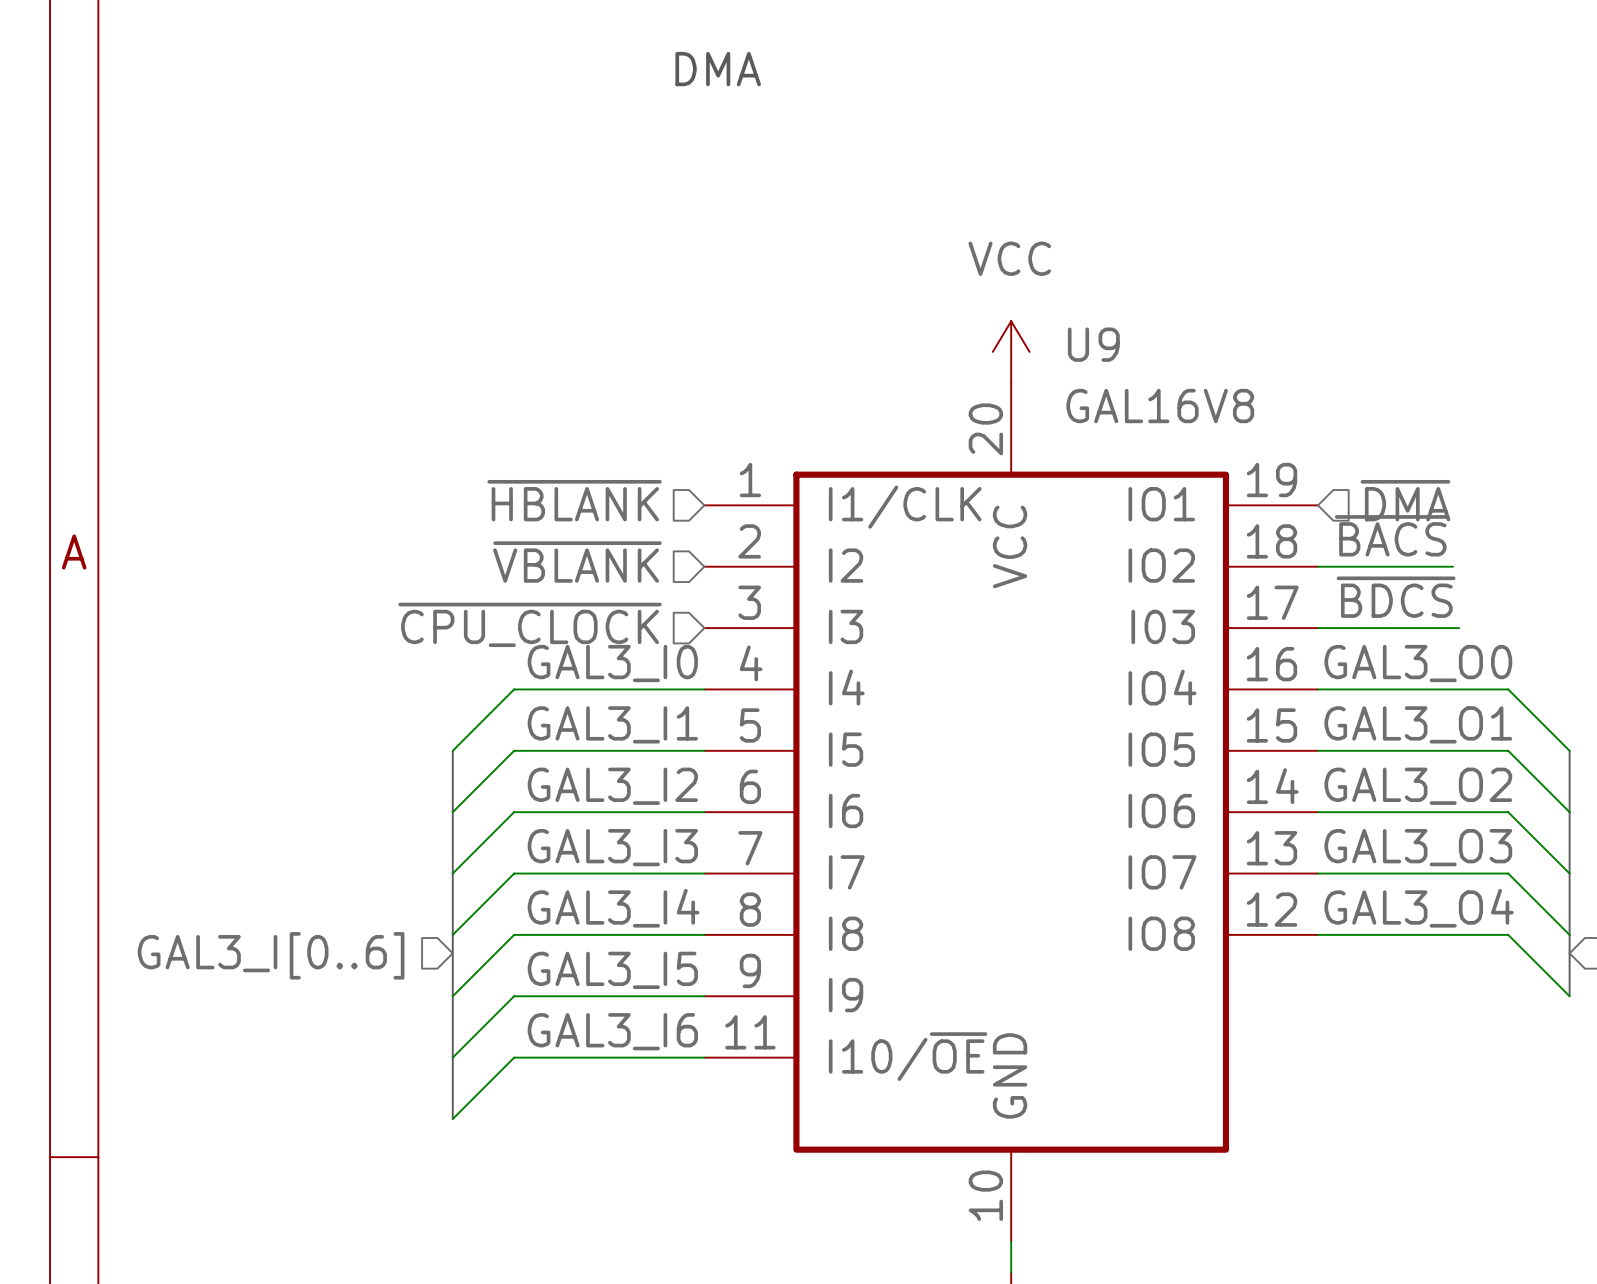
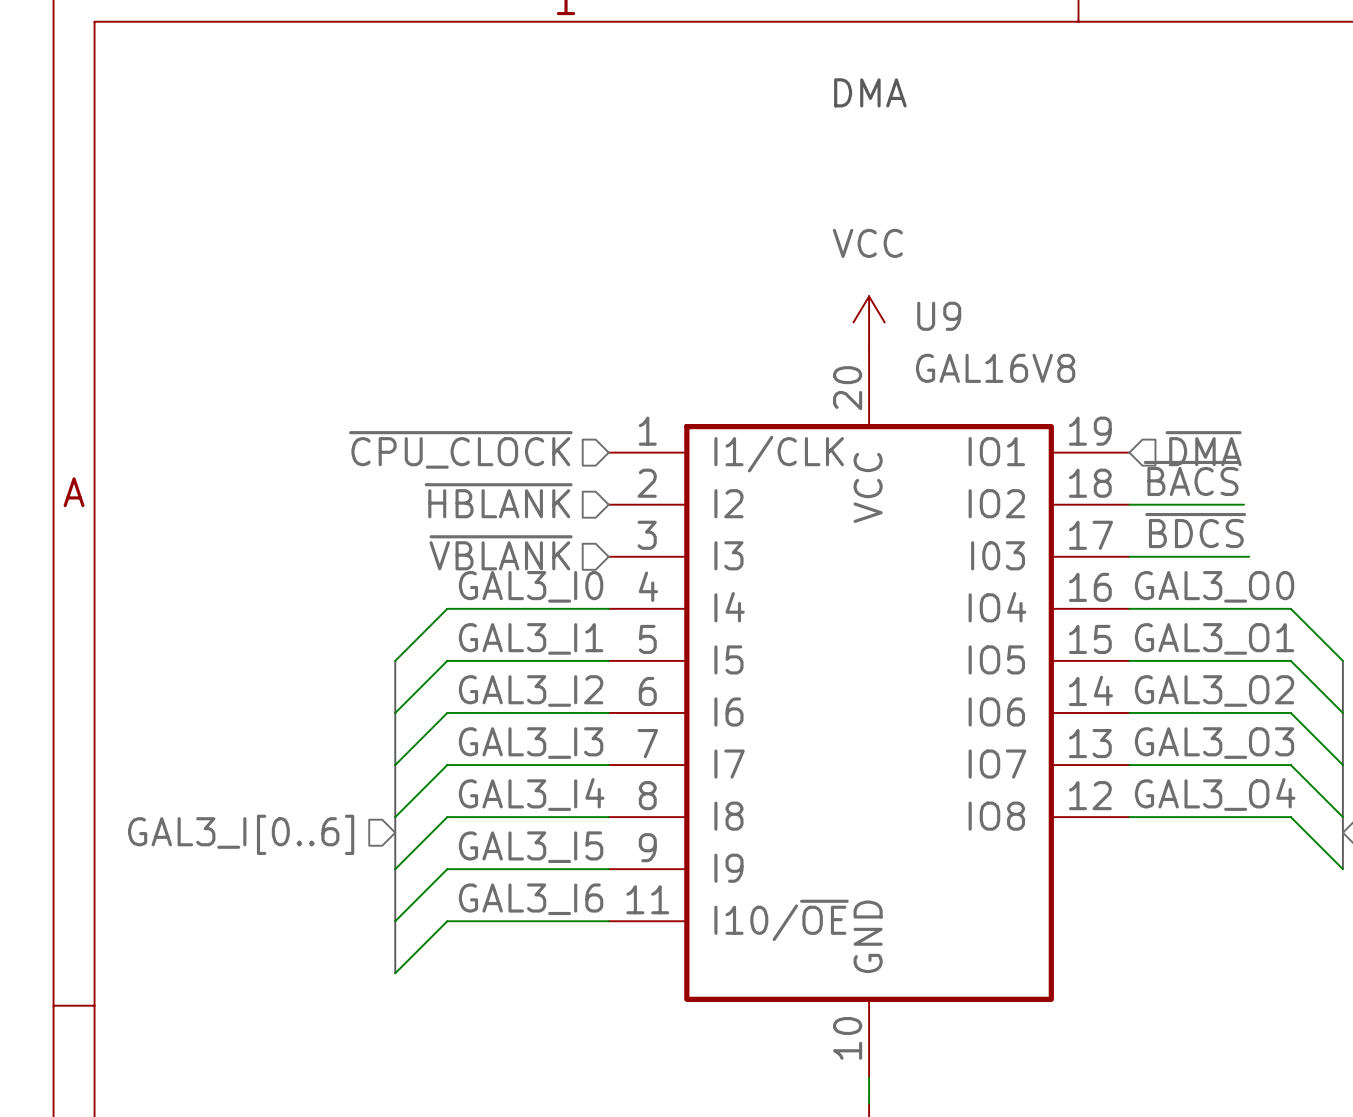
text position: DMA (718, 69) -> DMA (870, 92)
hierarchical label: ~{HBLANK} (574, 500) -> ~{CPU_CLOCK} (460, 449)
hierarchical label: ~{VBLANK} (577, 562) -> ~{HBLANK} (498, 500)
hierarchical label: ~{CPU_CLOCK} (530, 624) -> ~{VBLANK} (501, 552)

